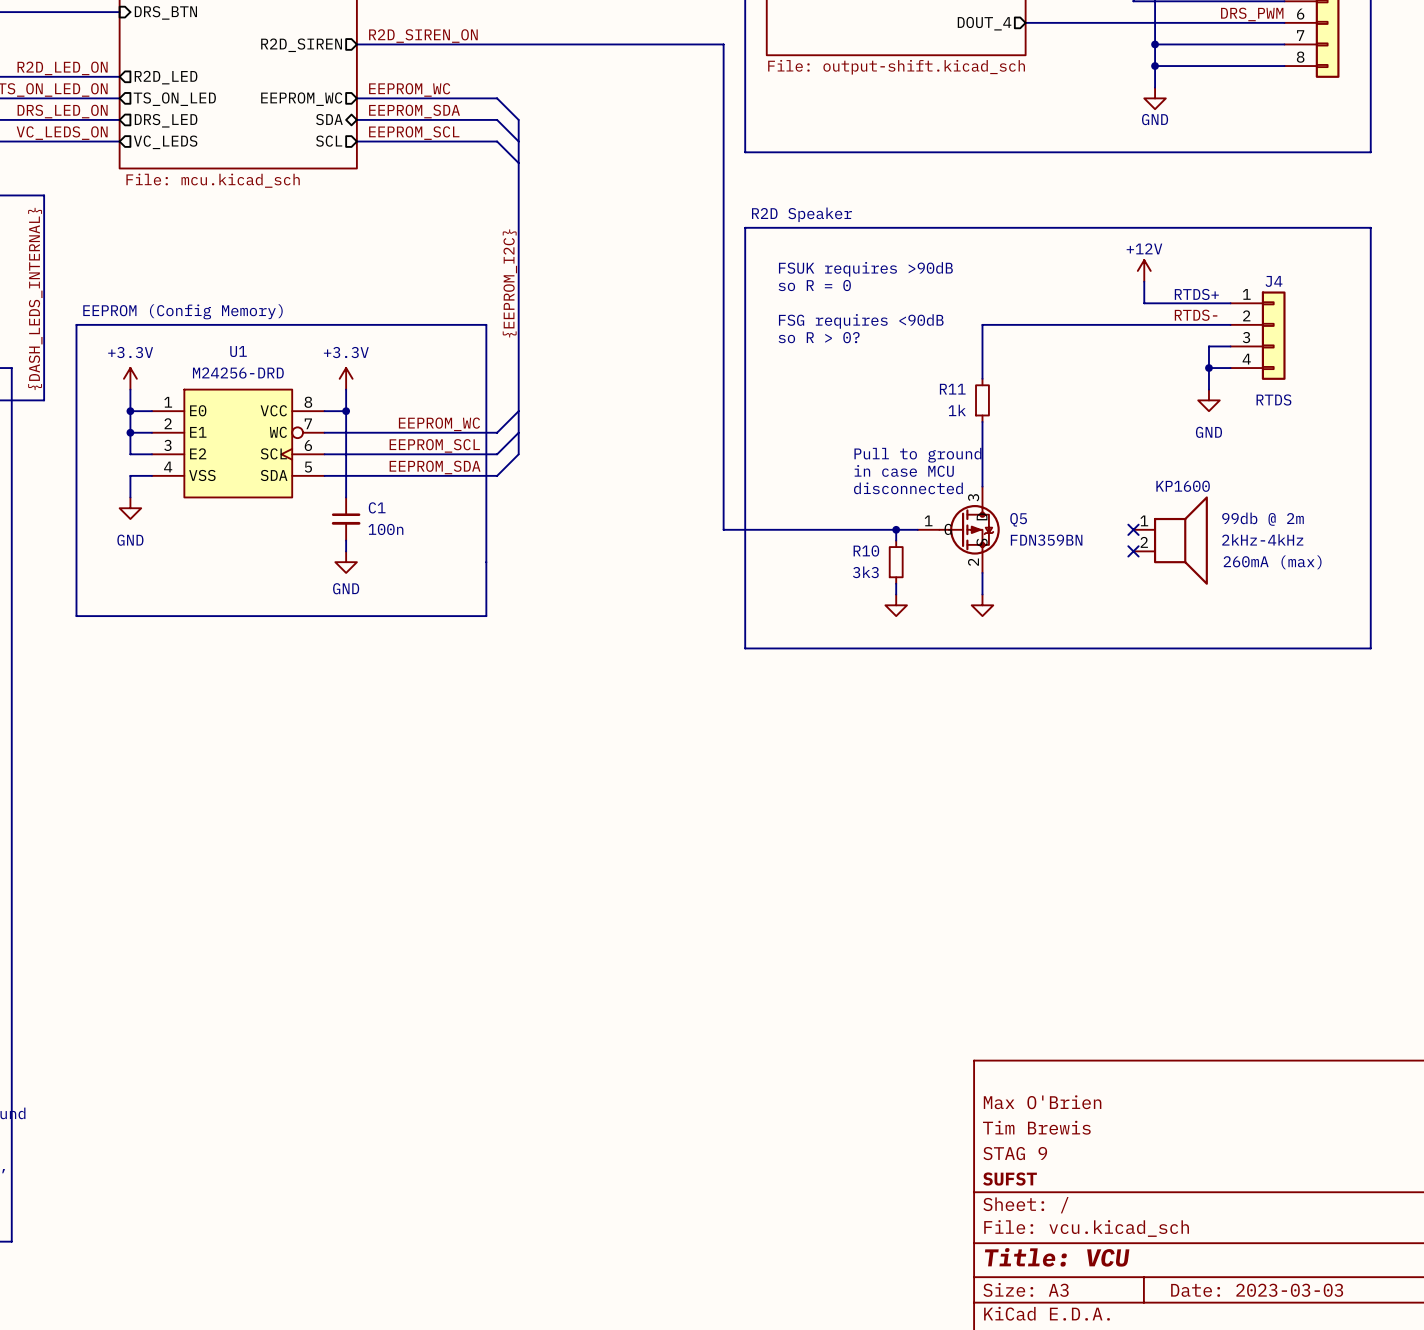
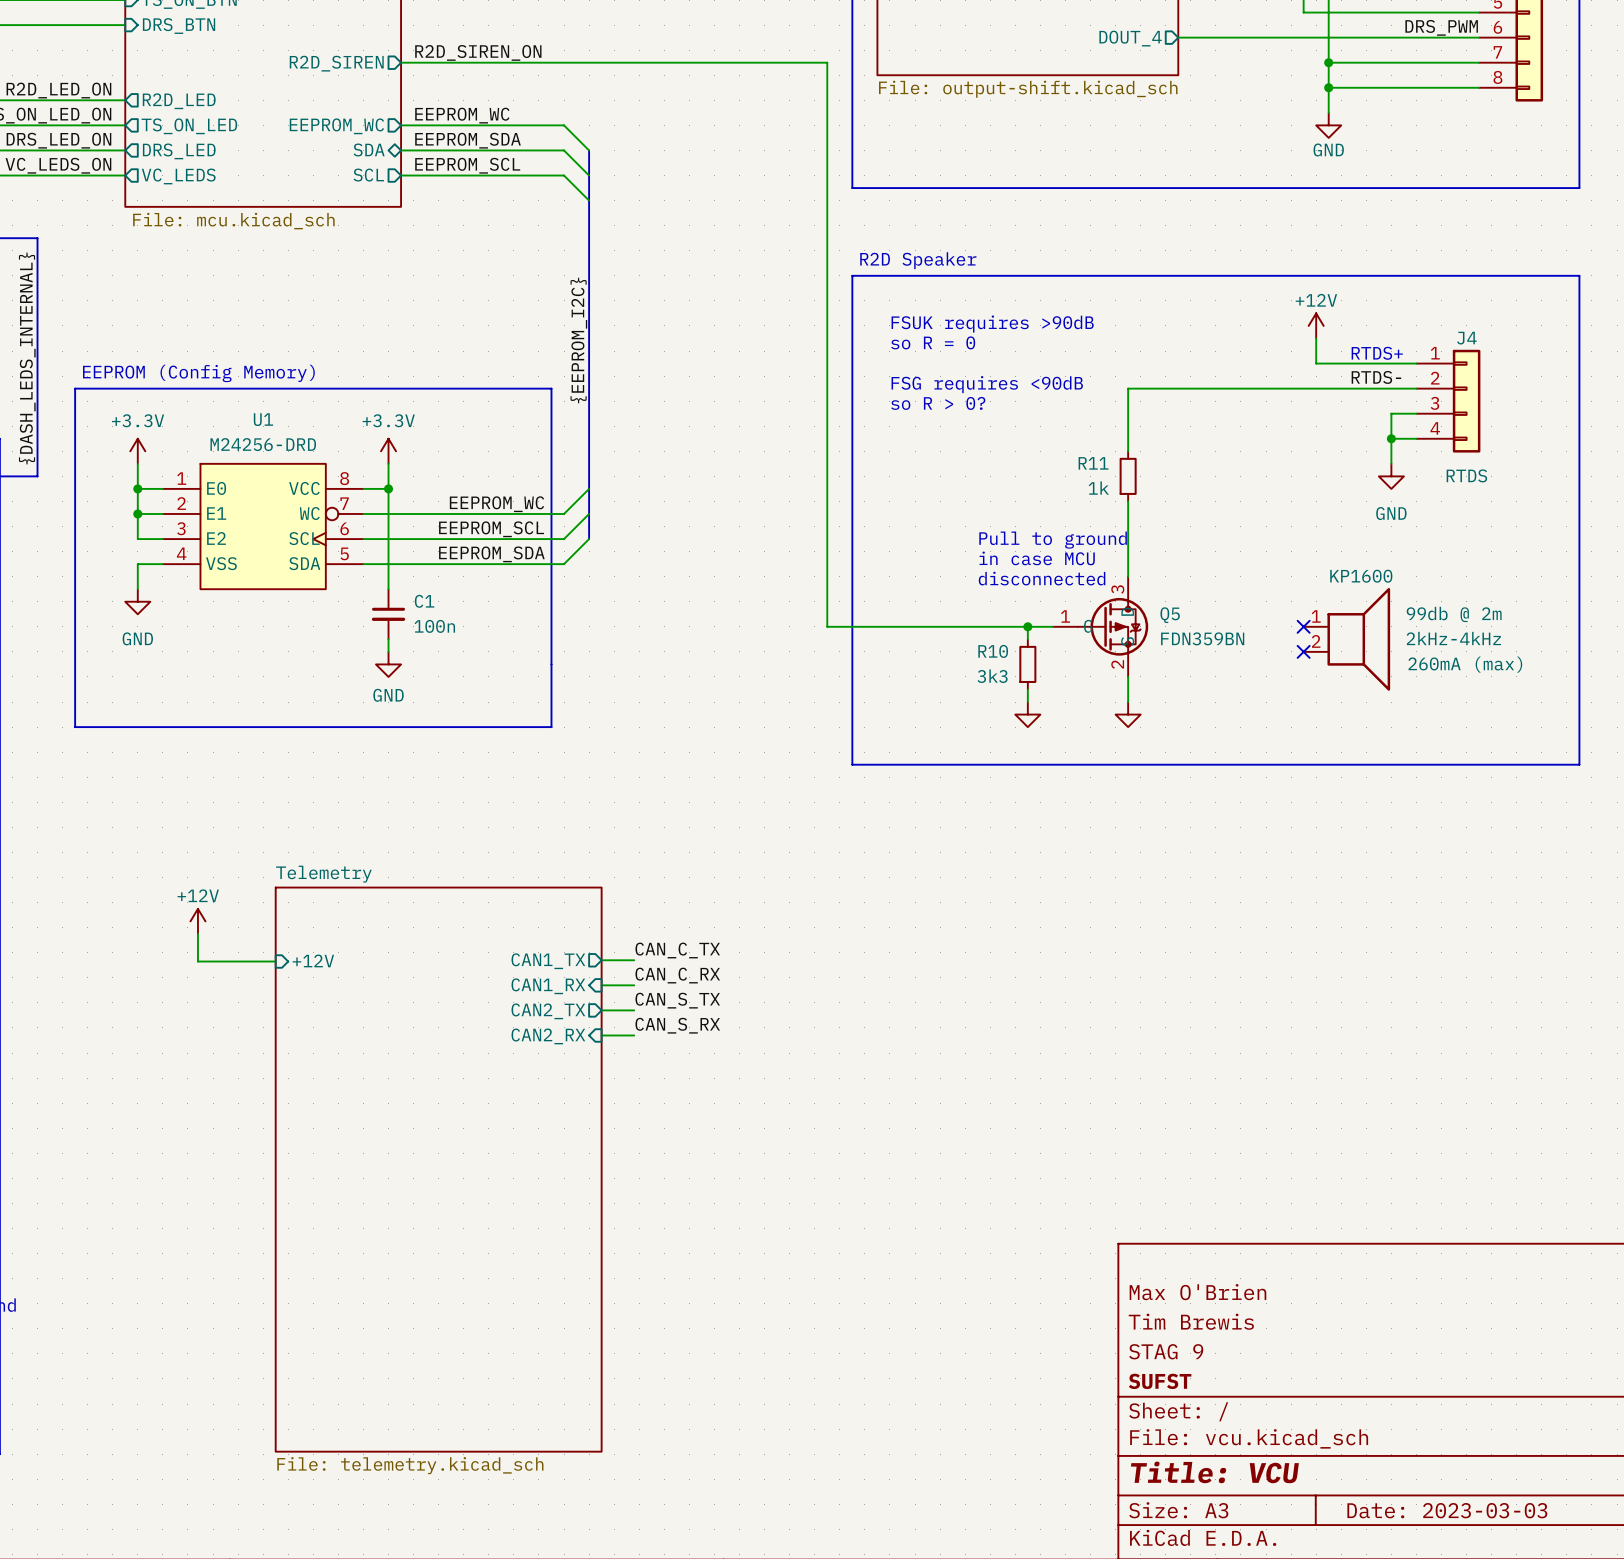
power symbol: none -> +12V (197, 921)
wire: none -> (197, 933) (197, 961) (275, 961)
label: none -> CAN_C_TX (677, 950)
wire: none -> (601, 960) (634, 960)
sheet pin: none -> +12V (313, 960)
sheet pin: none -> CAN1_TX (548, 961)
label: none -> CAN_C_RX (677, 975)
wire: none -> (601, 985) (634, 985)
sheet pin: none -> CAN1_RX (548, 986)
label: none -> CAN_S_TX (677, 1000)
wire: none -> (601, 1010) (634, 1010)
sheet pin: none -> CAN2_TX (548, 1011)
label: none -> CAN_S_RX (677, 1025)
wire: none -> (601, 1035) (634, 1035)
sheet pin: none -> CAN2_RX (548, 1036)
sheet Telemetry: none -> File: telemetry.kicad_sch (438, 1169)

